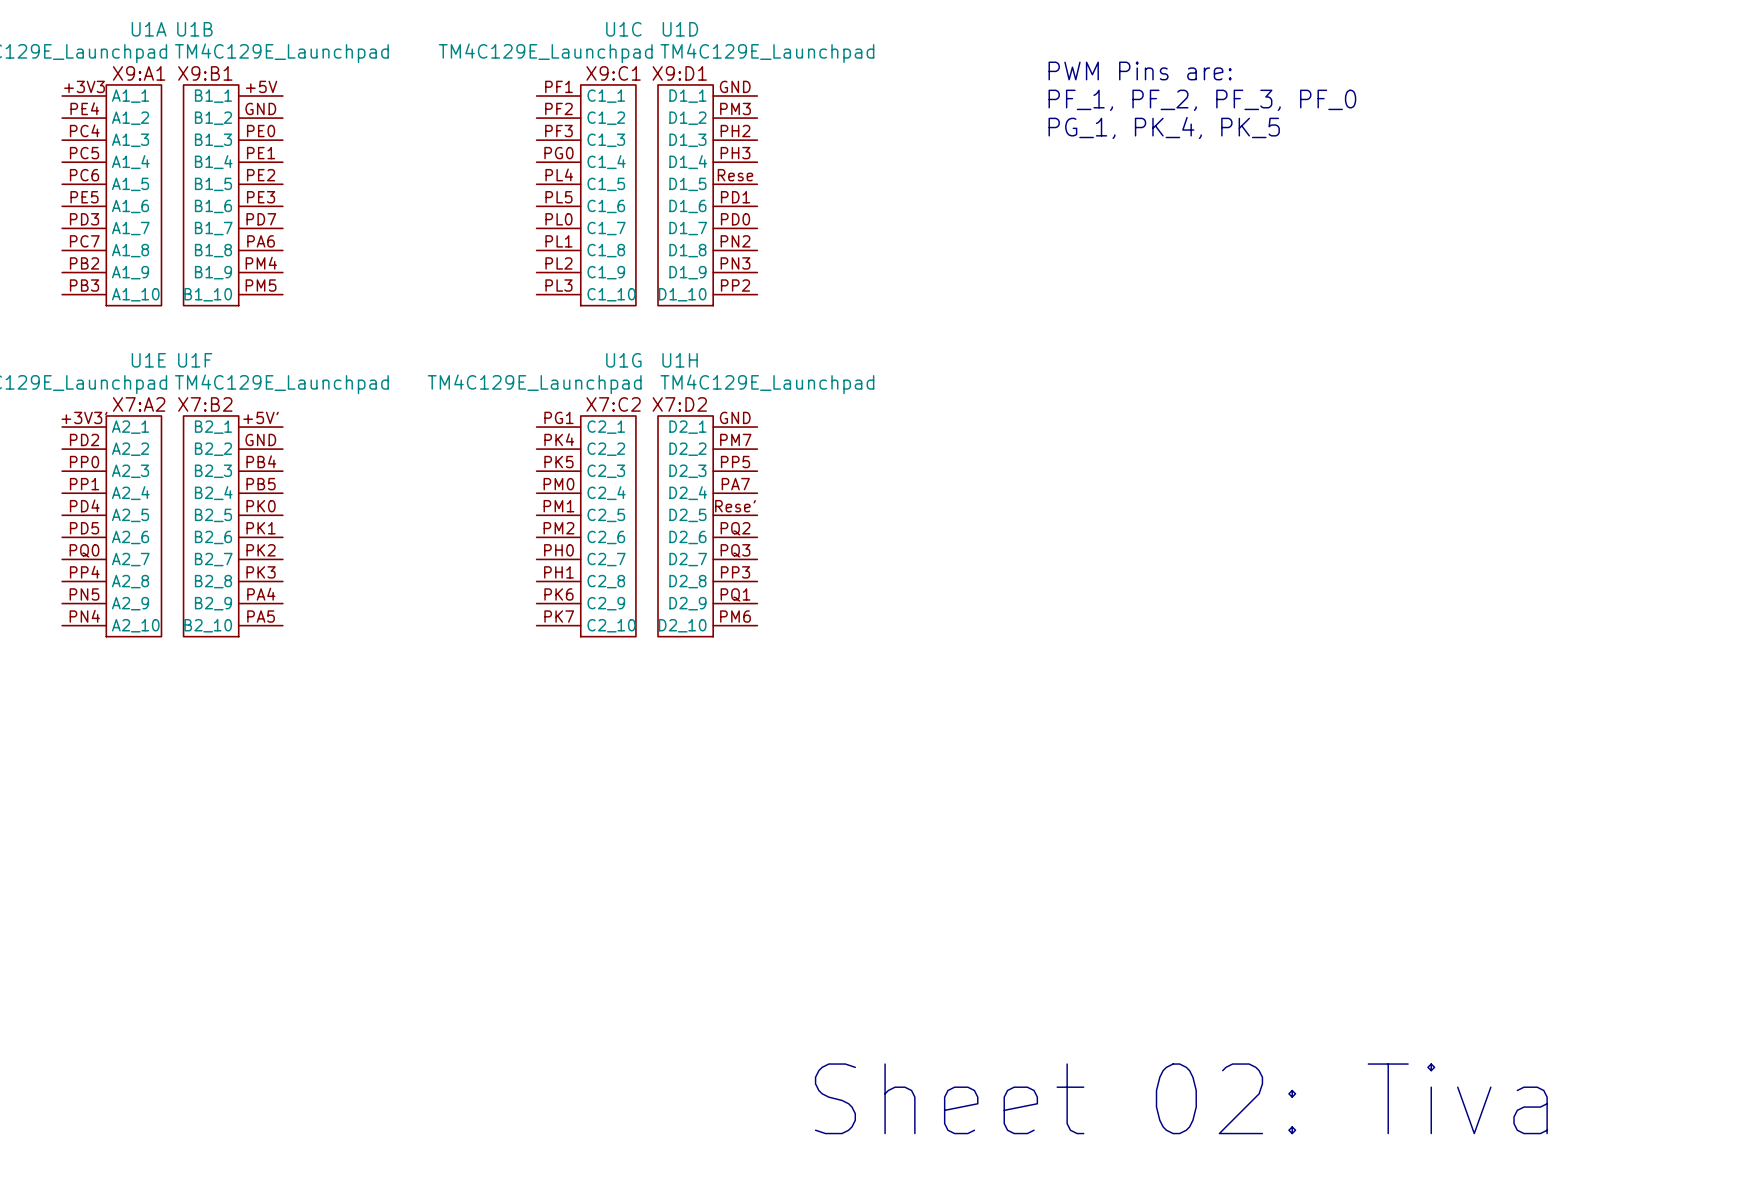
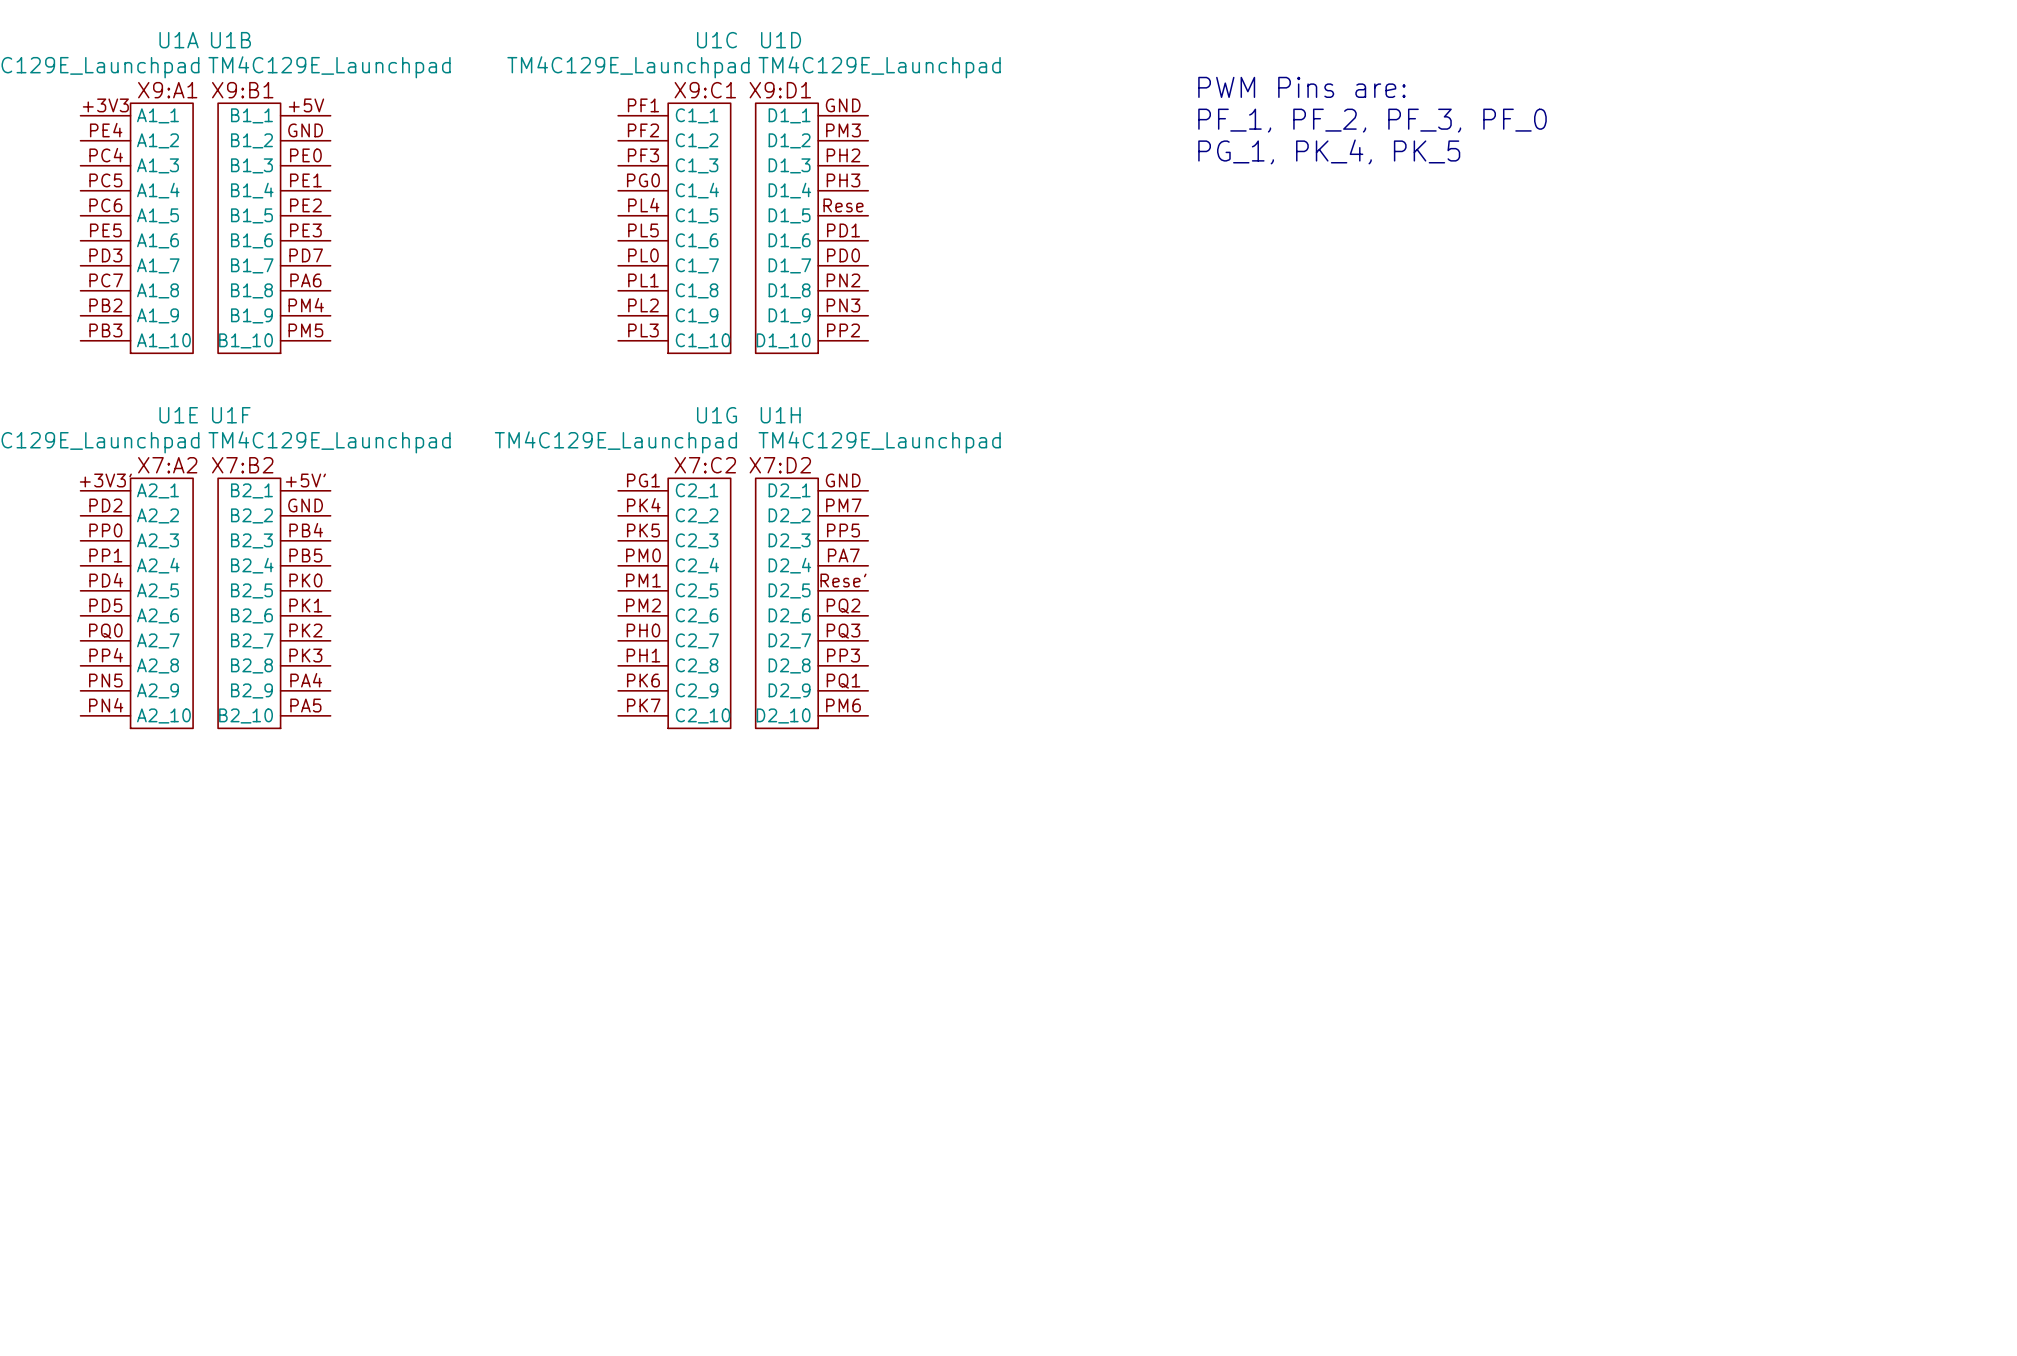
text: Sheet 02: Tiva (1181, 1098) -> none

